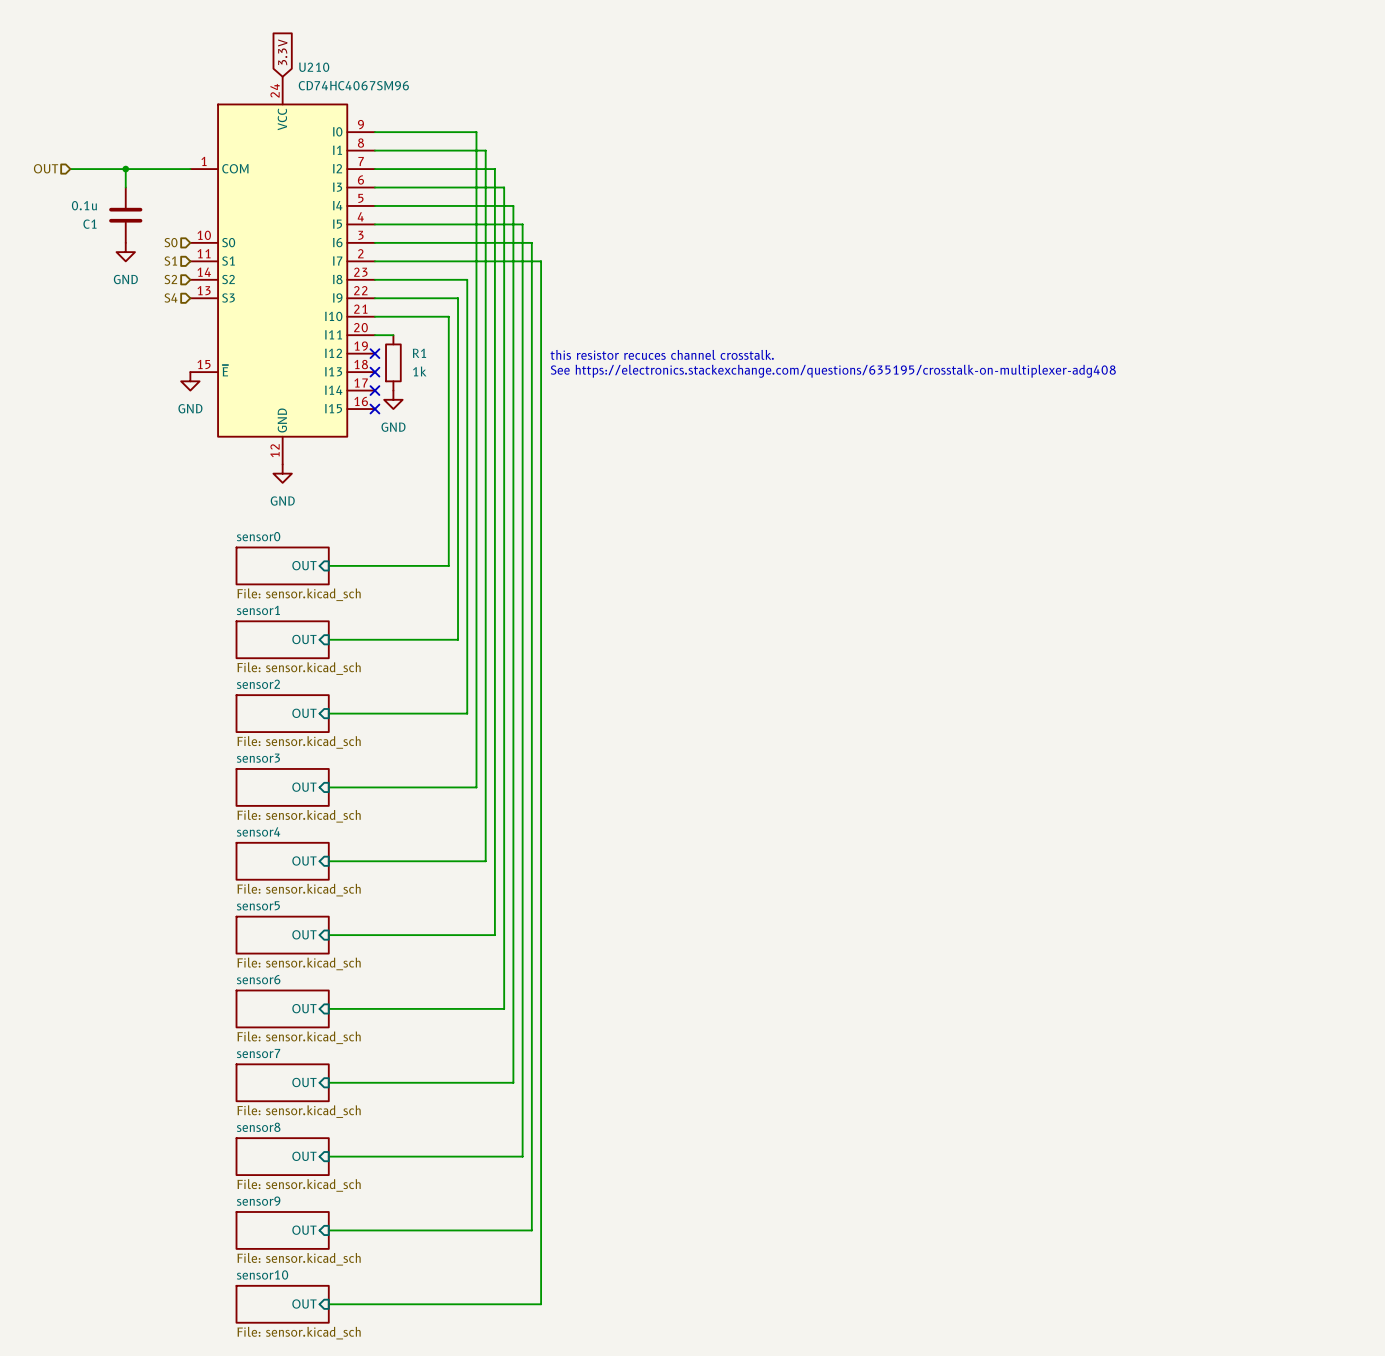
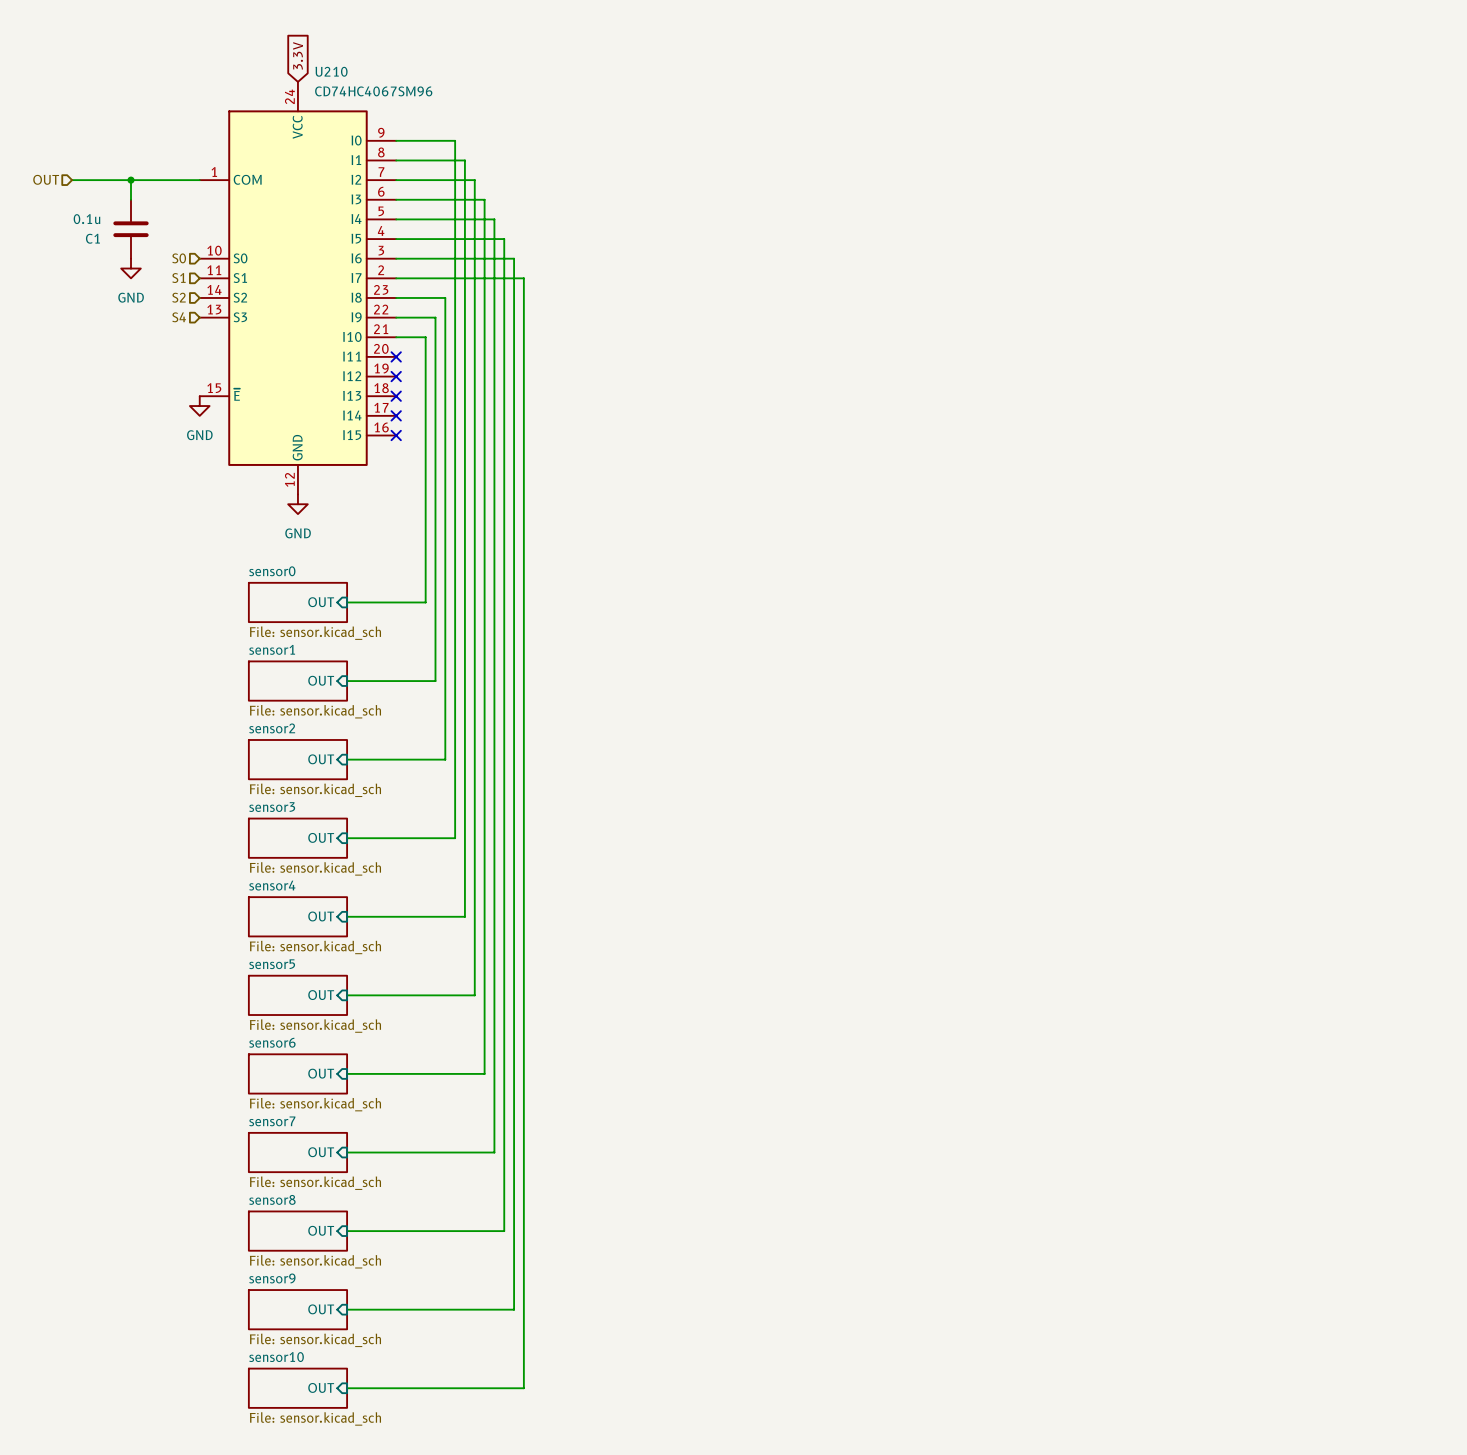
wire: (430, 132) (476, 132) (476, 224) (522, 224) (522, 1156) (476, 1156) -> (455, 140) (455, 838)
wire: (439, 150) (485, 150) (485, 242) (531, 242) (531, 1230) (485, 1230) -> (464, 160) (464, 916)
wire: (448, 169) (494, 169) (494, 261) (541, 261) (541, 1304) (494, 1304) -> (523, 995) (523, 1388)
wire: (458, 187) (504, 187) (504, 1008) (458, 1008) -> (484, 681) (484, 1073)
wire: (467, 205) (513, 205) (513, 1082) (467, 1082) -> none
wire: (421, 279) (467, 279) -> (494, 219) (494, 297)
wire: none -> (445, 297) (445, 759)
wire: (411, 298) (458, 298) -> (484, 199) (484, 317)
wire: (402, 316) (448, 316) -> (474, 180) (474, 337)
wire: (374, 335) (393, 335) -> none
no-connect mark: none -> (396, 356)
text: this resistor recuces channel crosstalk. (662, 354) -> none
R1: 1k (393, 362) -> none
text: See https://electronics.stackexchange.com/questions/635195/crosstalk-on-multiplexer-adg408 (833, 371) -> none
power symbol: GND (393, 399) -> none
wire: (402, 565) (448, 565) -> (425, 602) (425, 337)
wire: (411, 639) (458, 639) -> (435, 681) (435, 317)
wire: (421, 713) (467, 713) -> (494, 1152) (494, 759)
wire: (430, 787) (476, 787) -> (504, 1231) (504, 838)
wire: (439, 861) (485, 861) -> (514, 1309) (514, 916)
wire: (448, 935) (494, 935) -> (474, 995) (474, 602)

